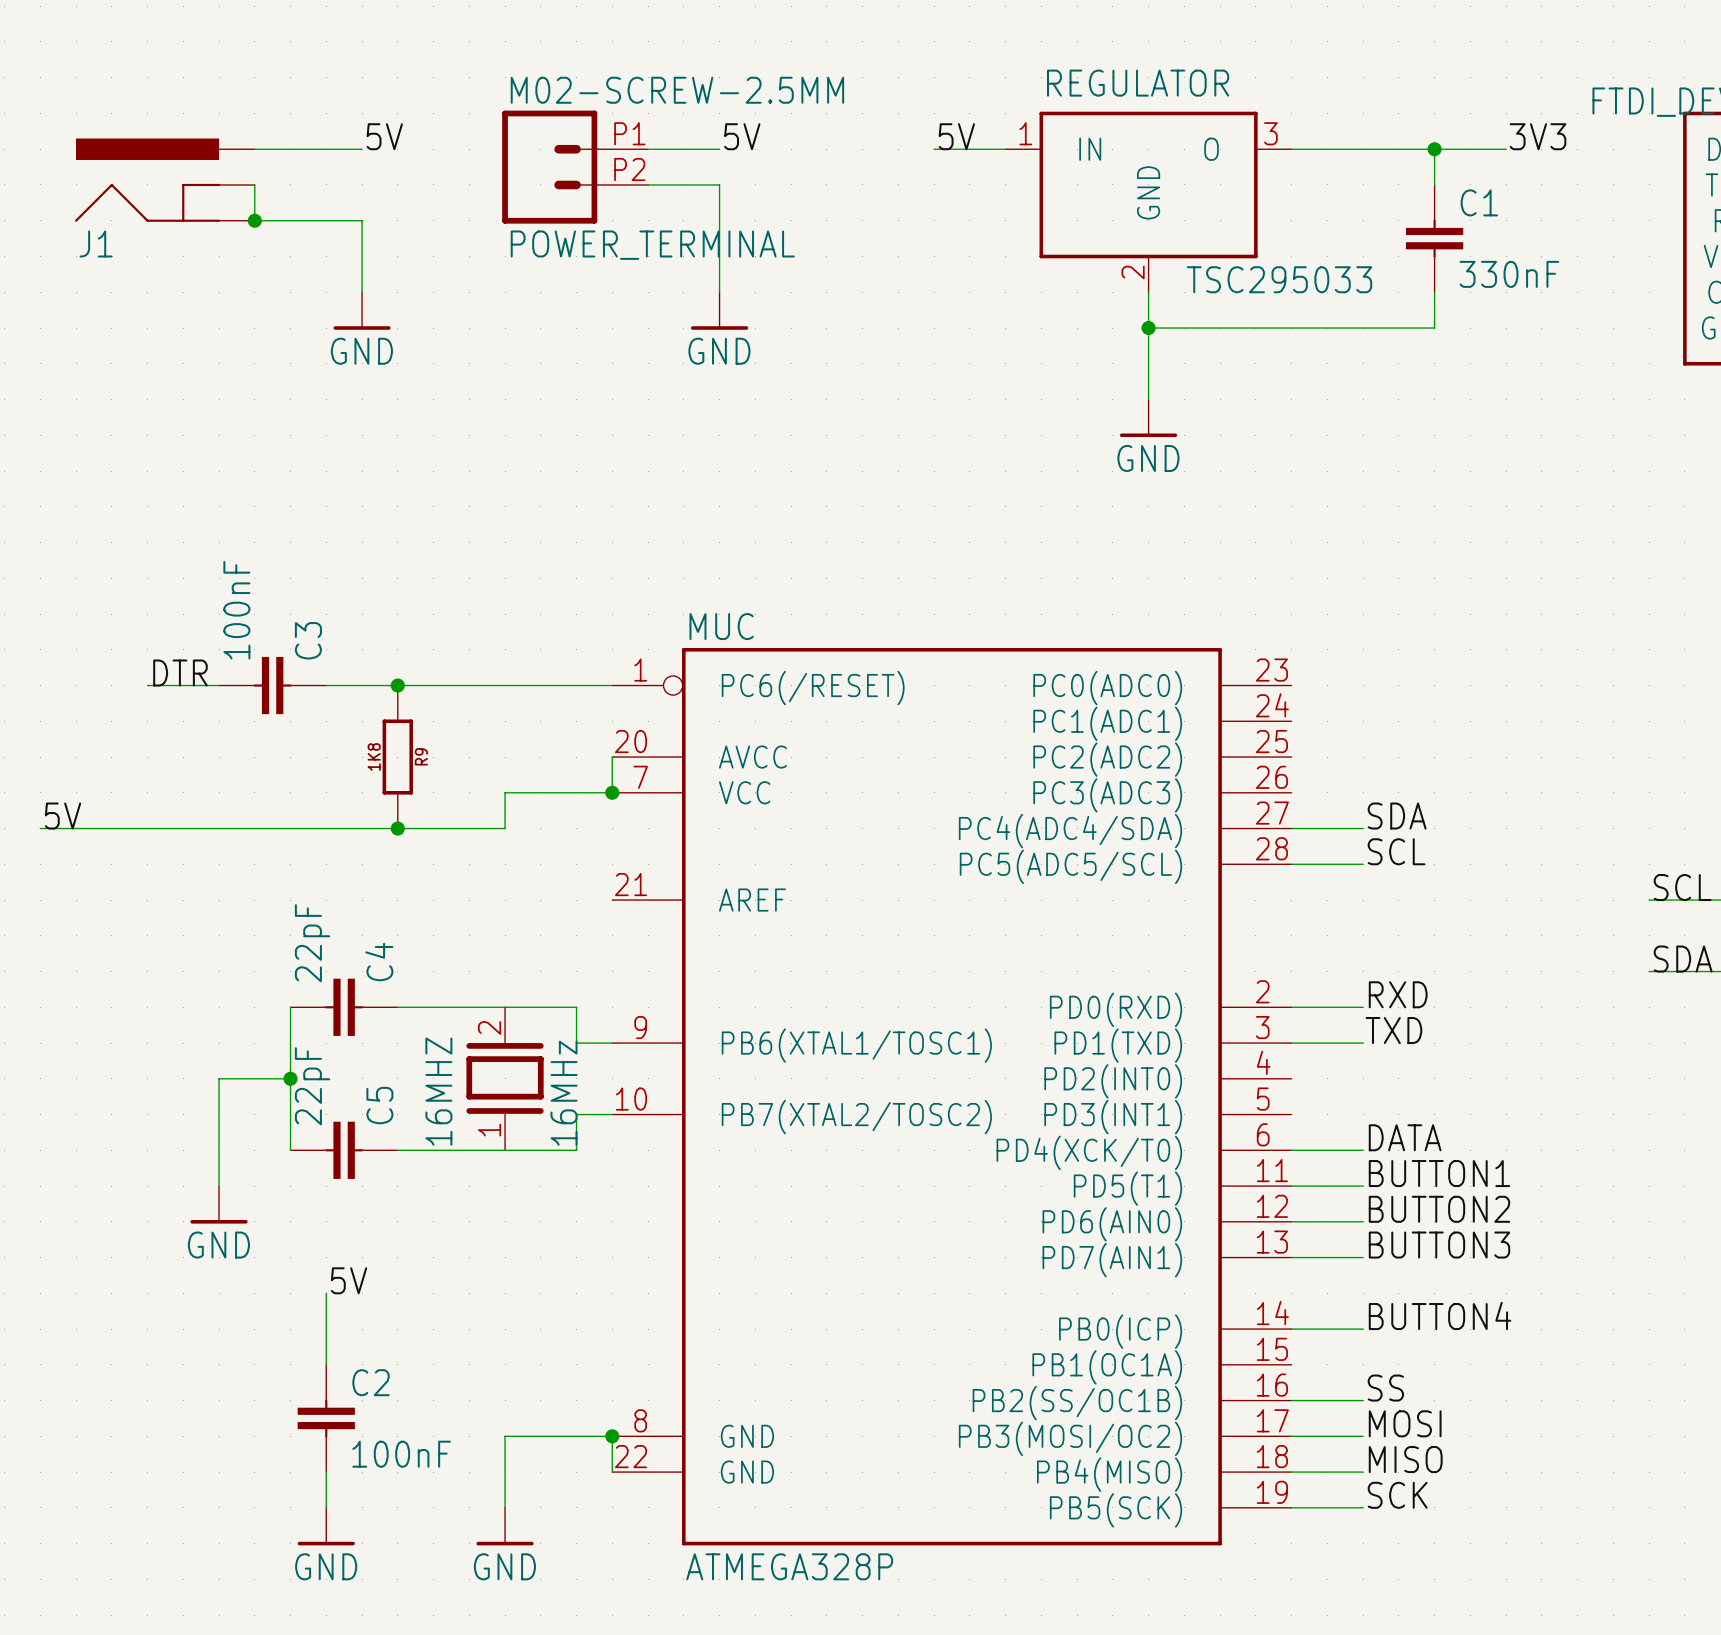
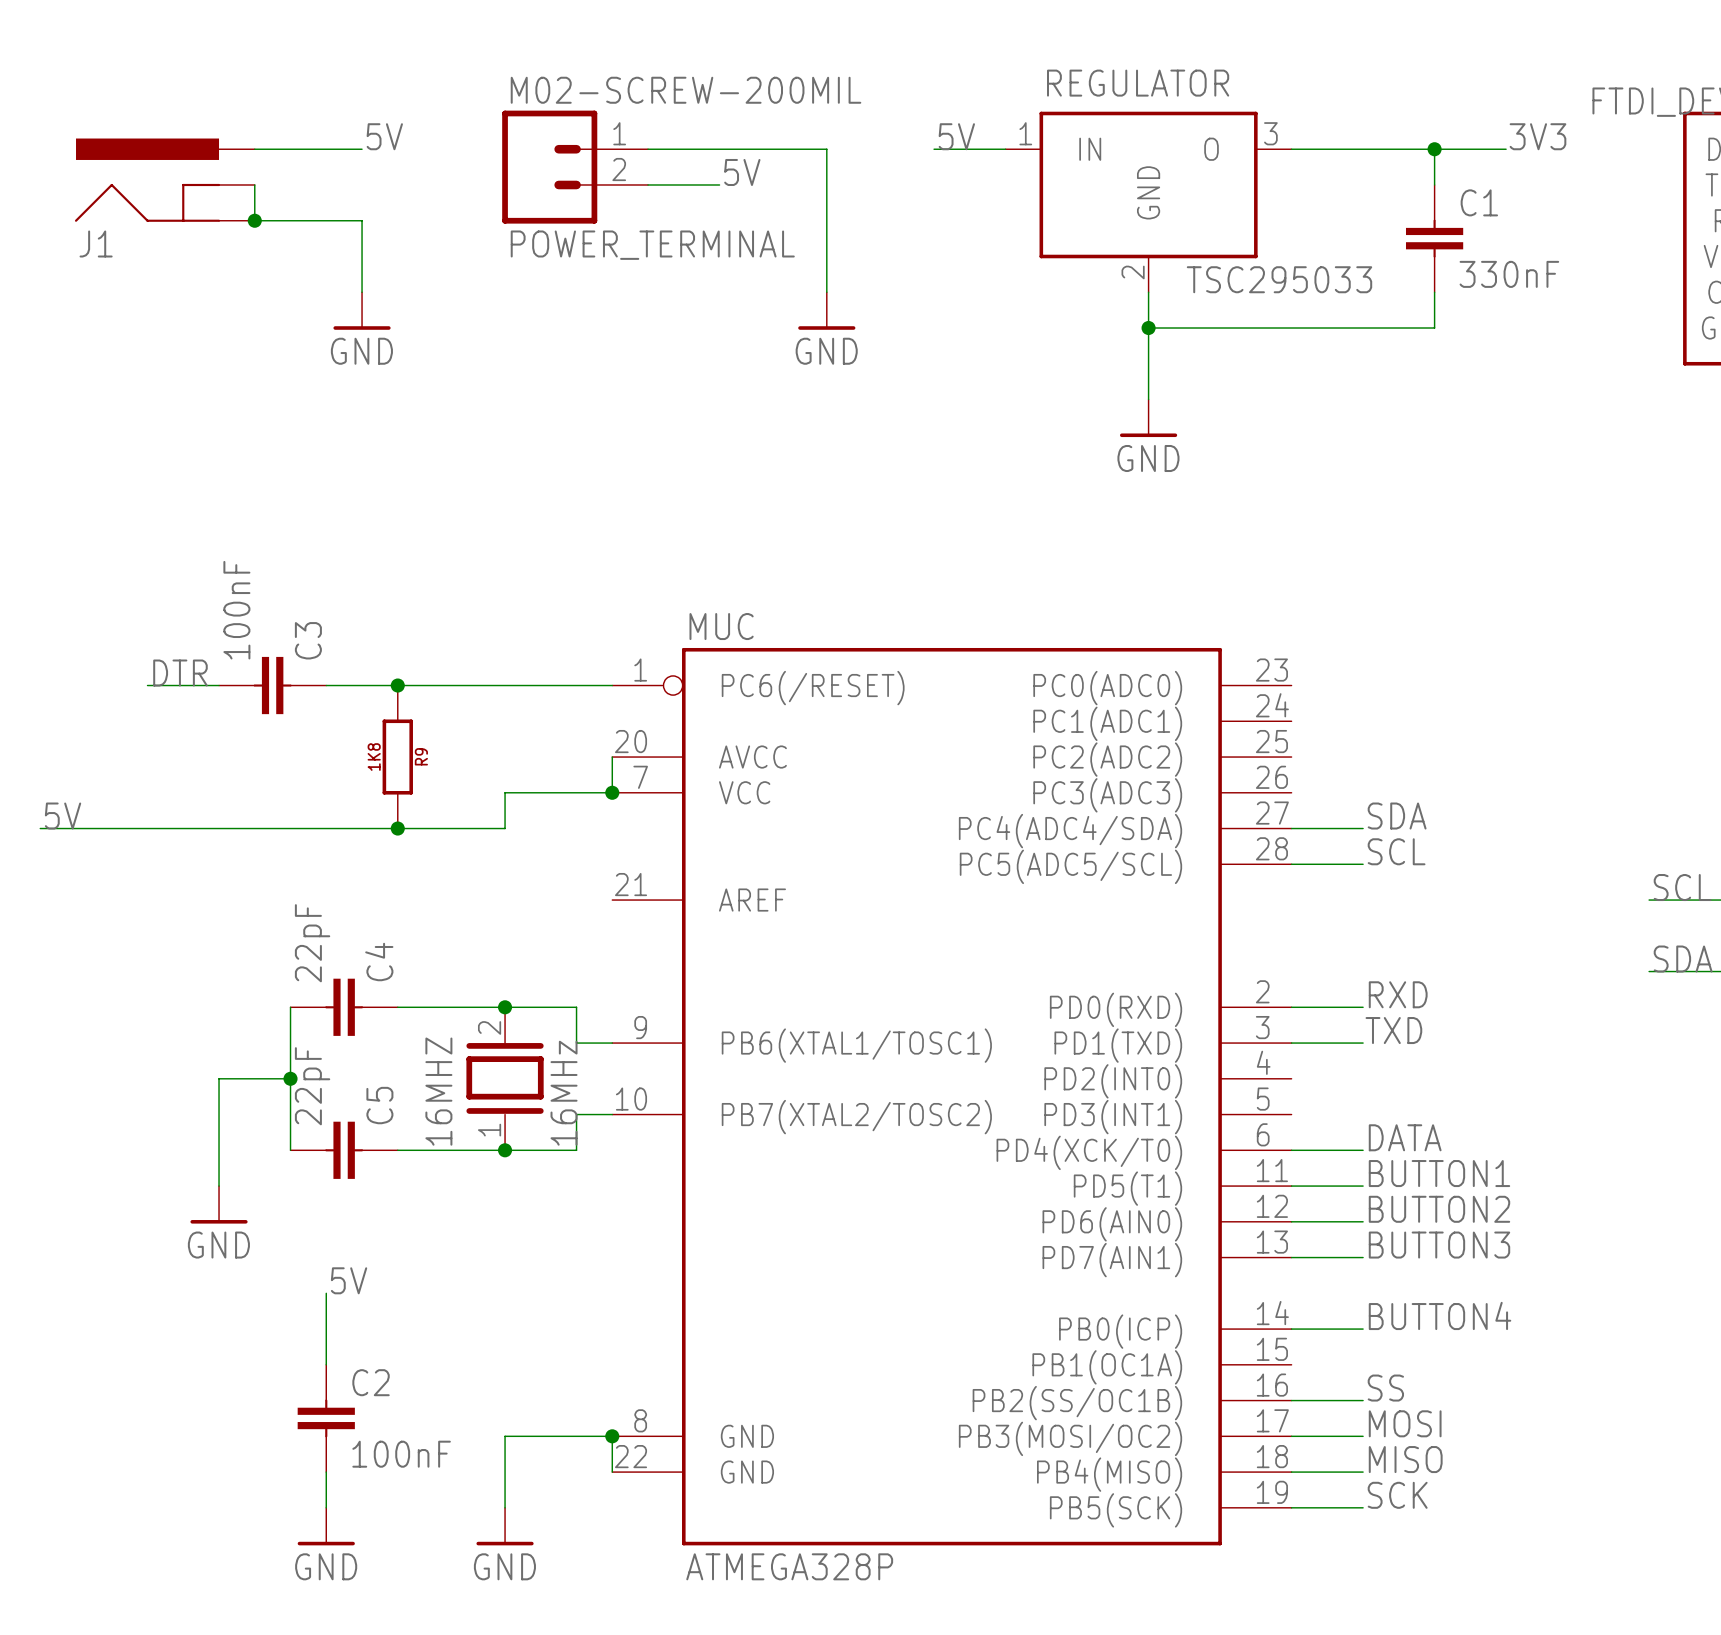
POWER_TERMINAL value: M02-SCREW-2.5MM (677, 90) -> M02-SCREW-200MIL (686, 90)
POWER_TERMINAL pin number: P1 (629, 133) -> 1 (619, 133)
label position: 5V (742, 136) -> 5V (742, 172)
wire: none -> (719, 149) (826, 149) (826, 292)
POWER_TERMINAL pin number: P2 (629, 169) -> 2 (619, 169)
wire: (719, 184) (719, 292) -> none
power symbol position: GND (719, 311) -> GND (826, 311)
junction: none -> (505, 1007)
junction: none -> (505, 1150)

